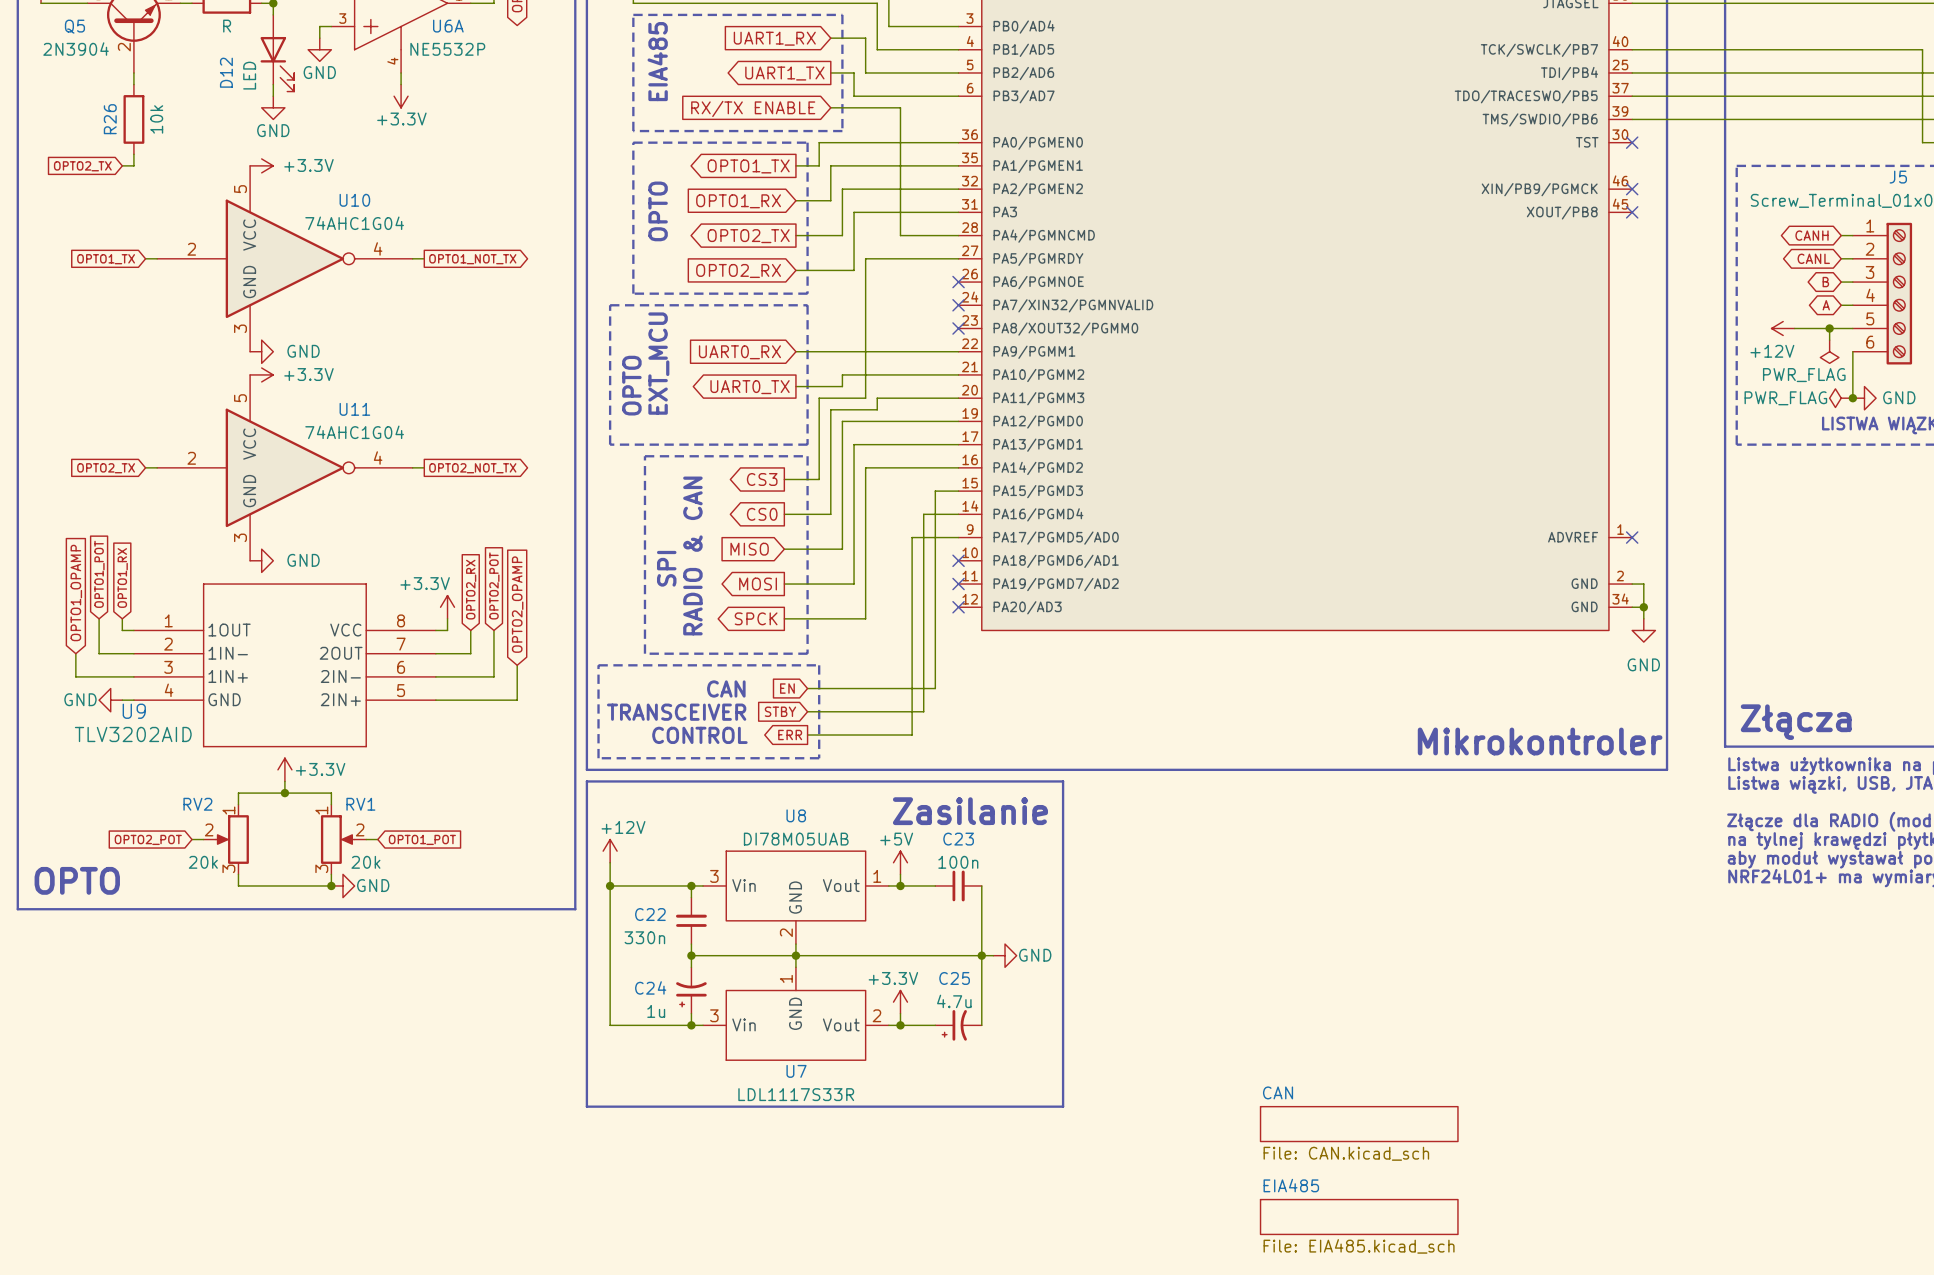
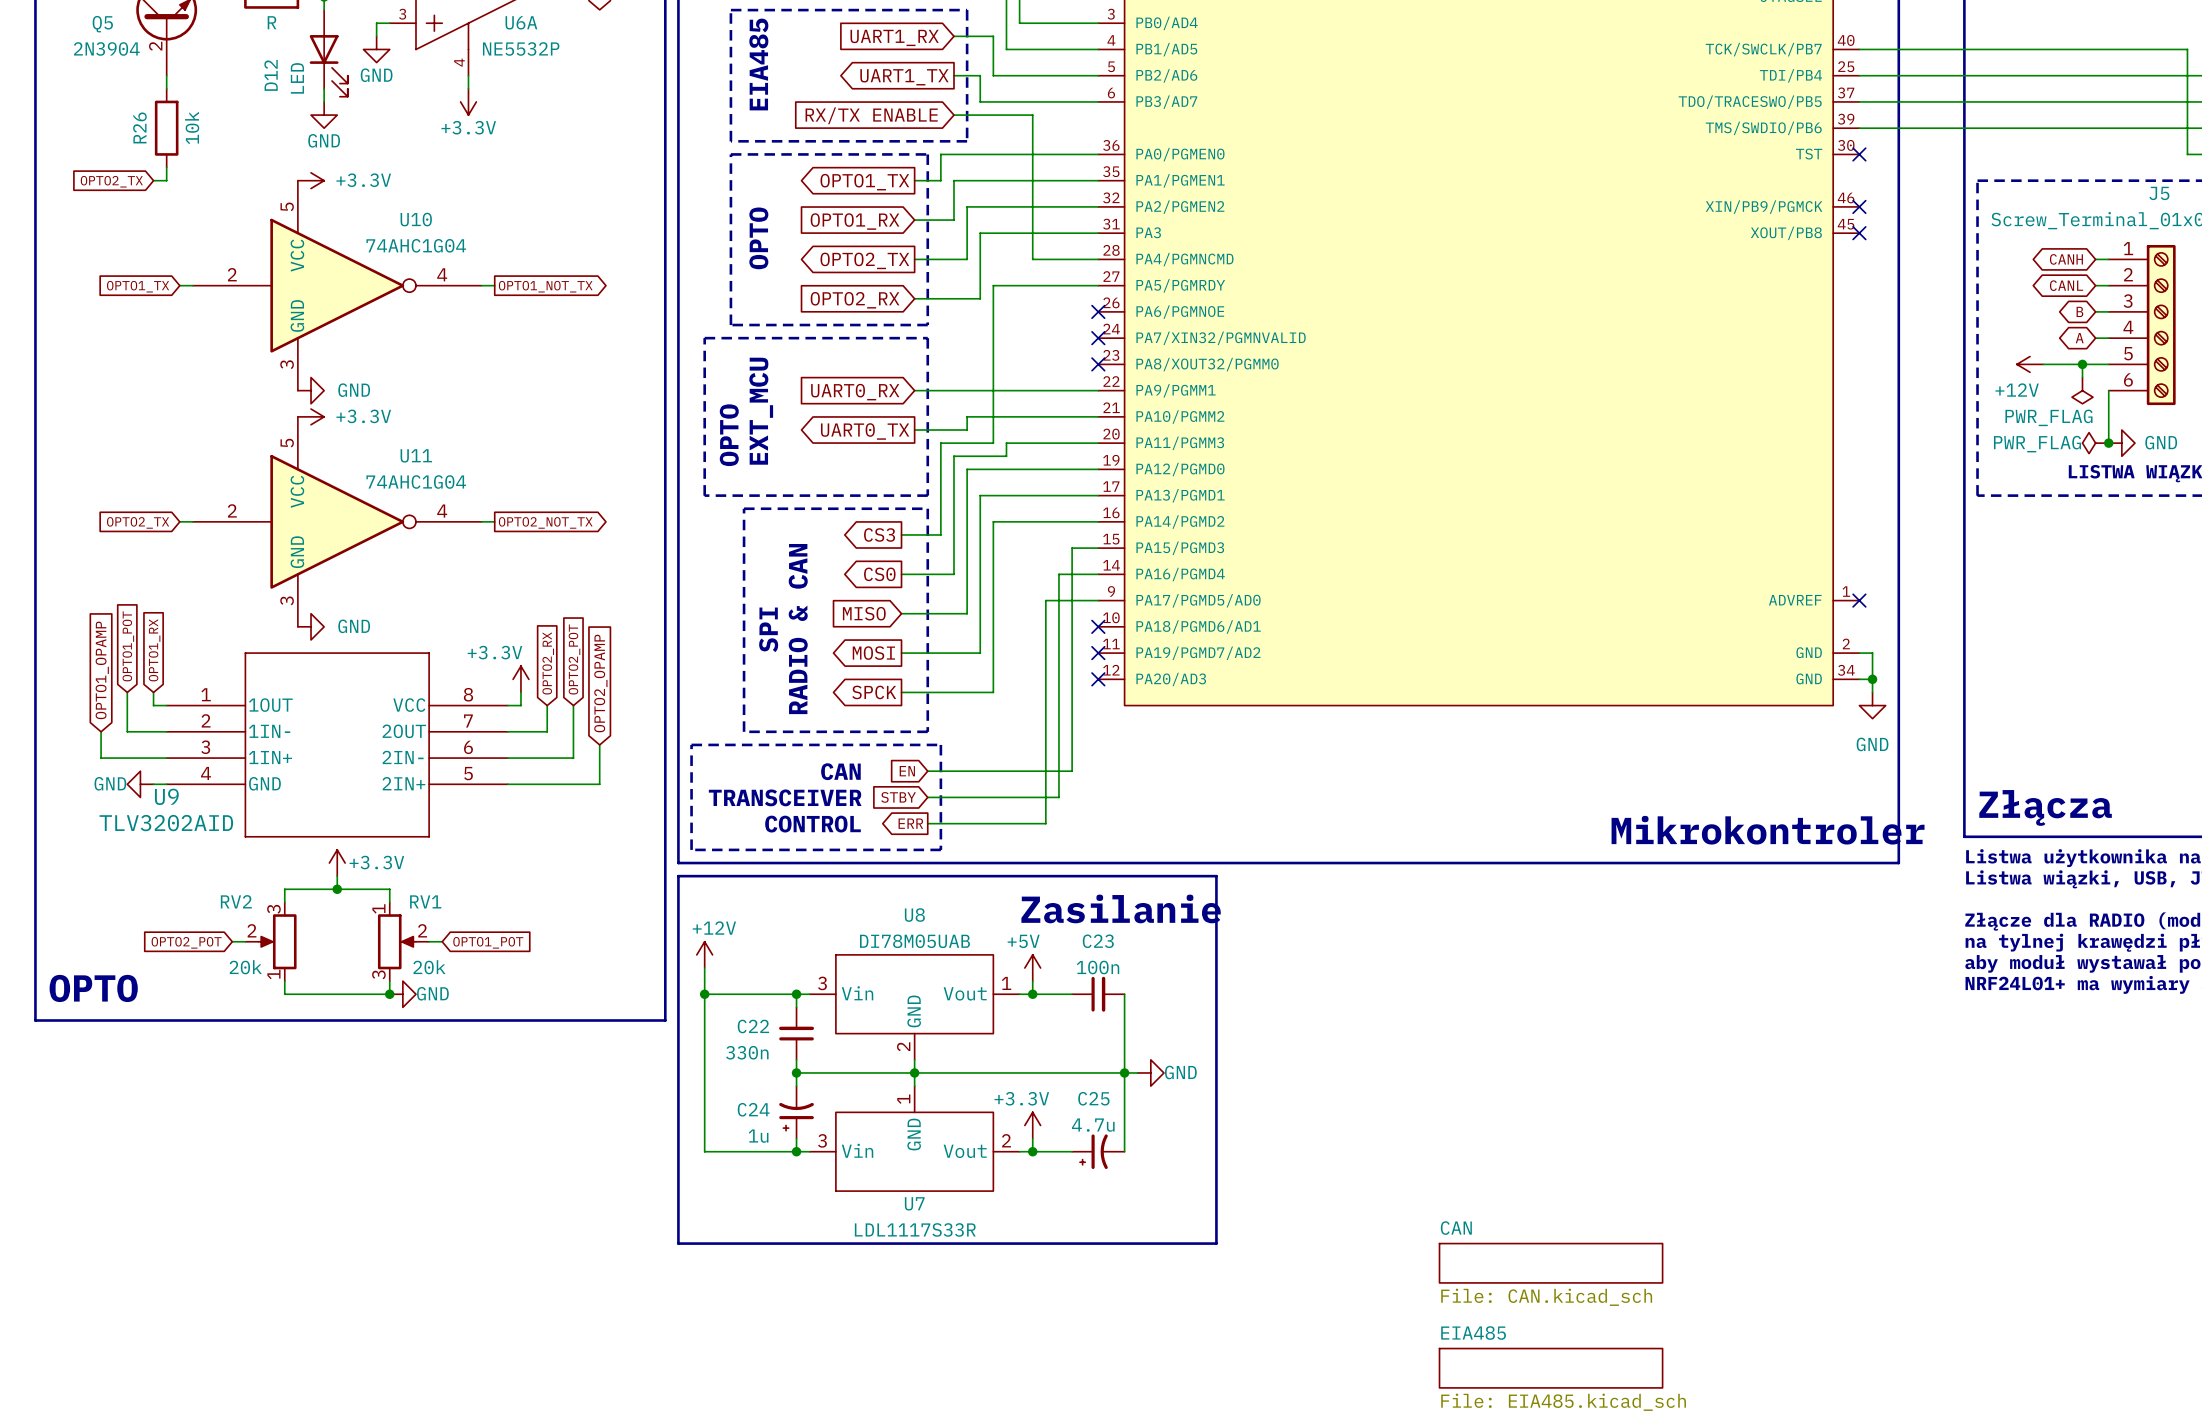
RV2 flip: as is (232, 839) -> up-down (277, 941)

